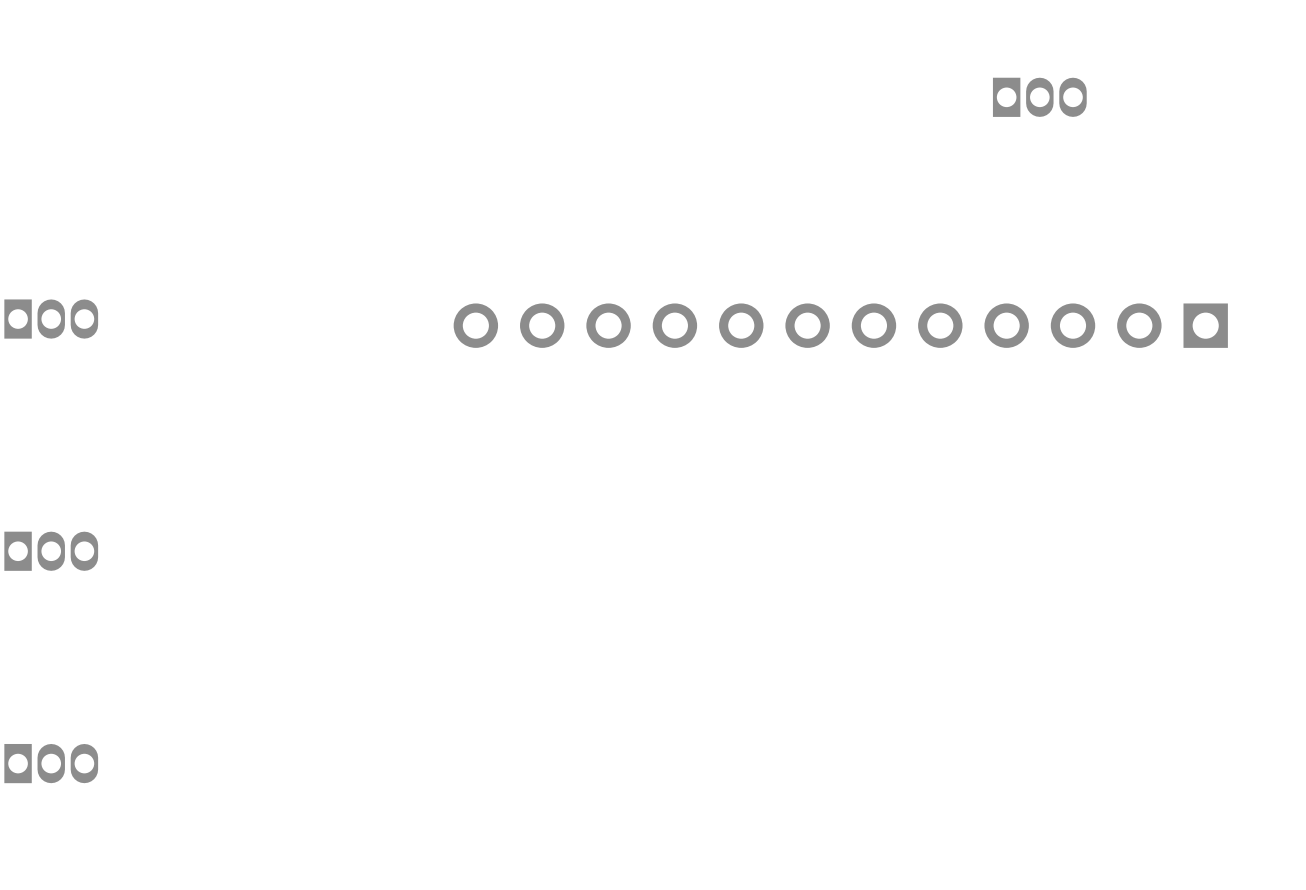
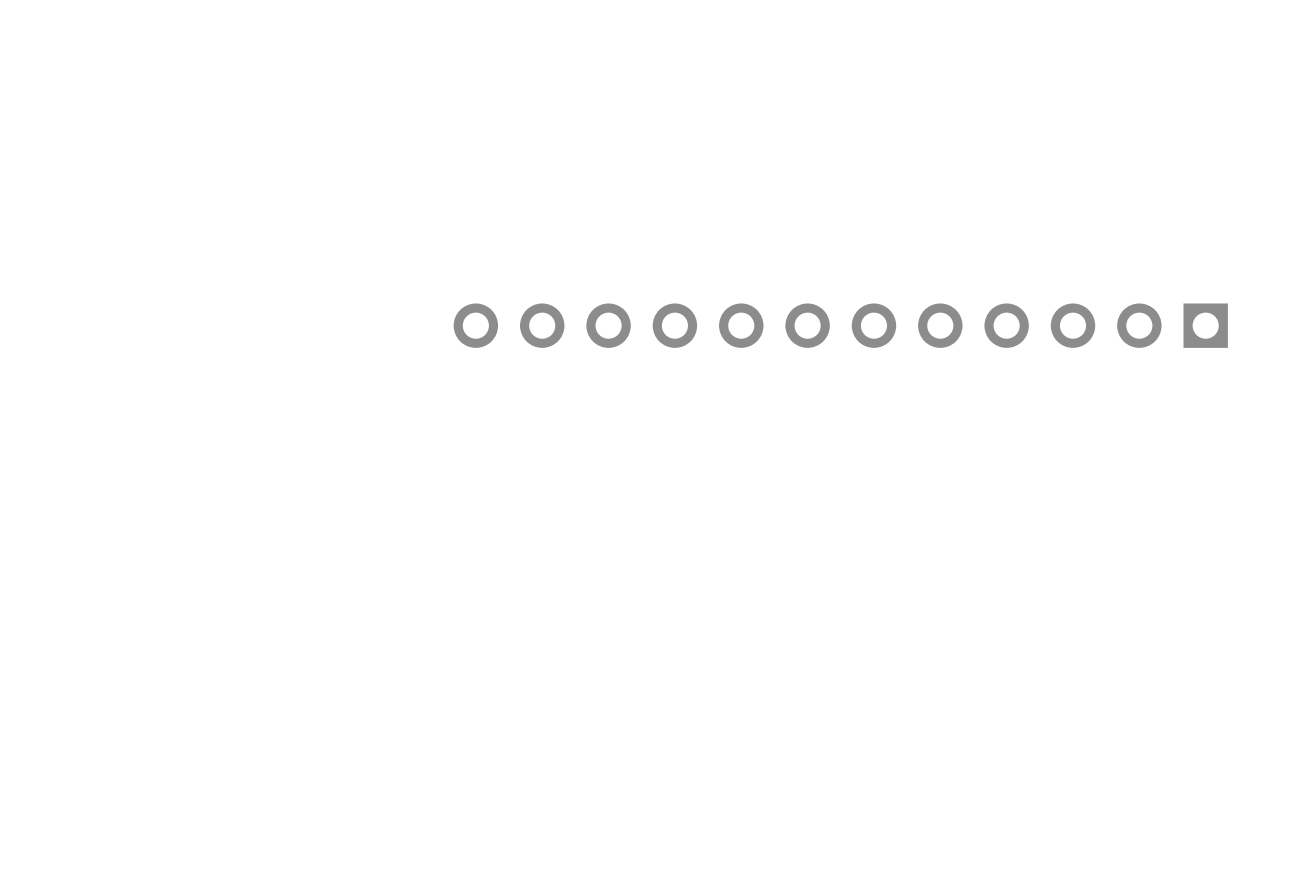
part: (1039, 97) -> none
part: (51, 319) -> none
part: (51, 551) -> none
part: (51, 763) -> none

